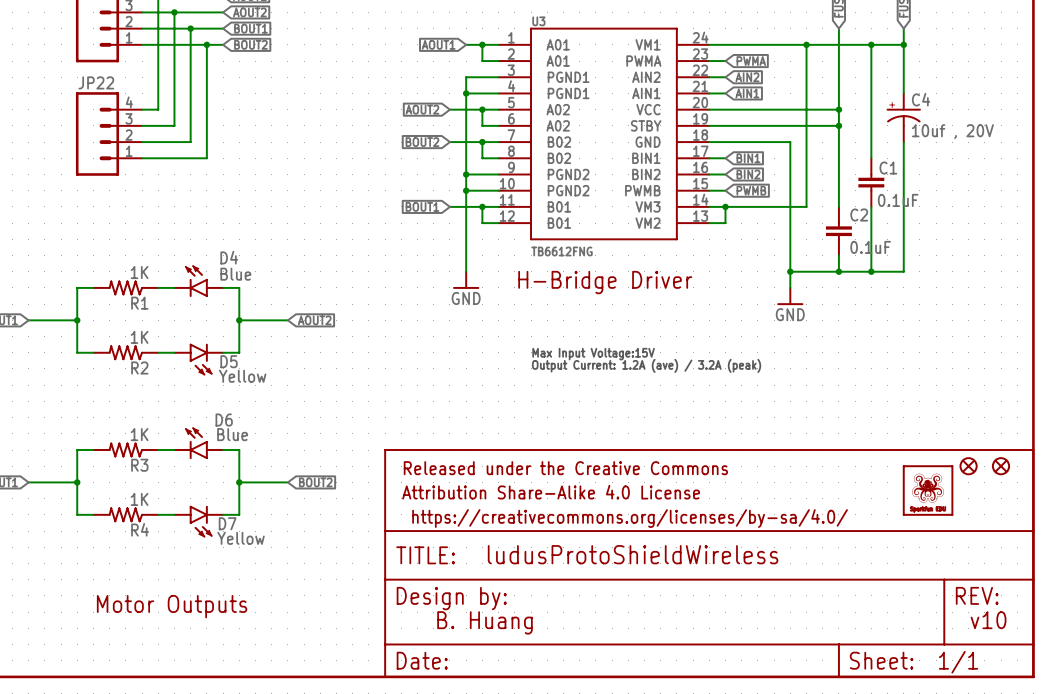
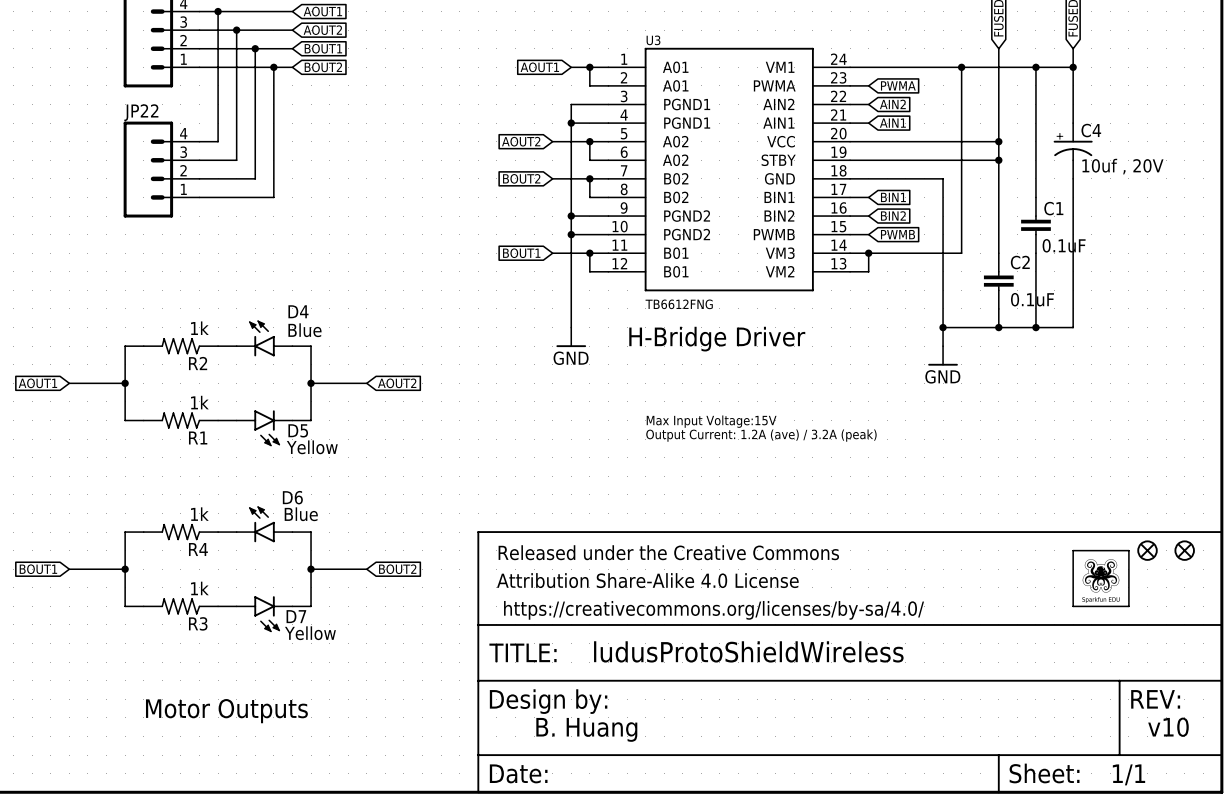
R1 value: 1K (139, 272) -> 1k (199, 328)
R1 name: R1 (139, 303) -> R2 (198, 363)
R2 value: 1K (139, 337) -> 1k (199, 402)
R2 name: R2 (139, 368) -> R1 (198, 437)
R3 value: 1K (139, 434) -> 1k (199, 514)
R3 name: R3 (139, 465) -> R4 (198, 549)
R4 value: 1K (139, 499) -> 1k (199, 588)
R4 name: R4 (140, 529) -> R3 (198, 623)

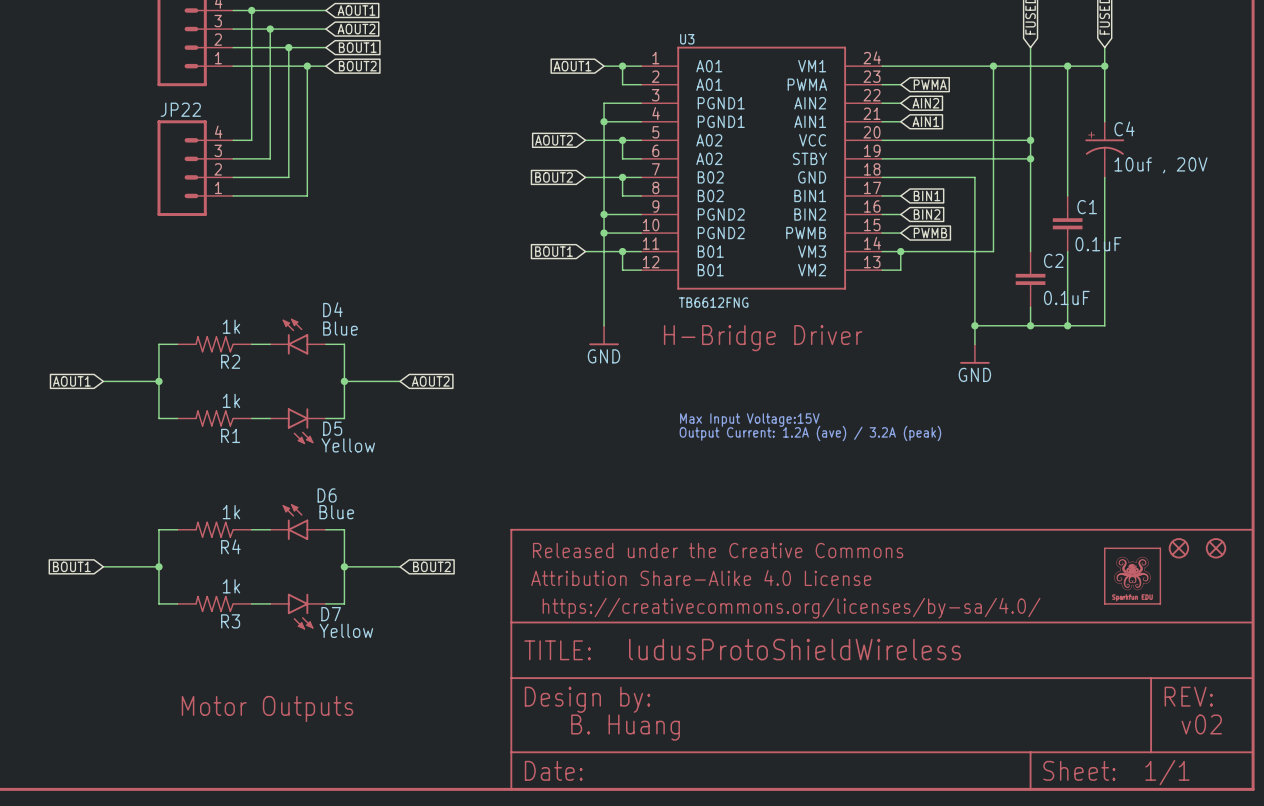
text: v10 (1168, 727) -> v02 (1201, 724)

